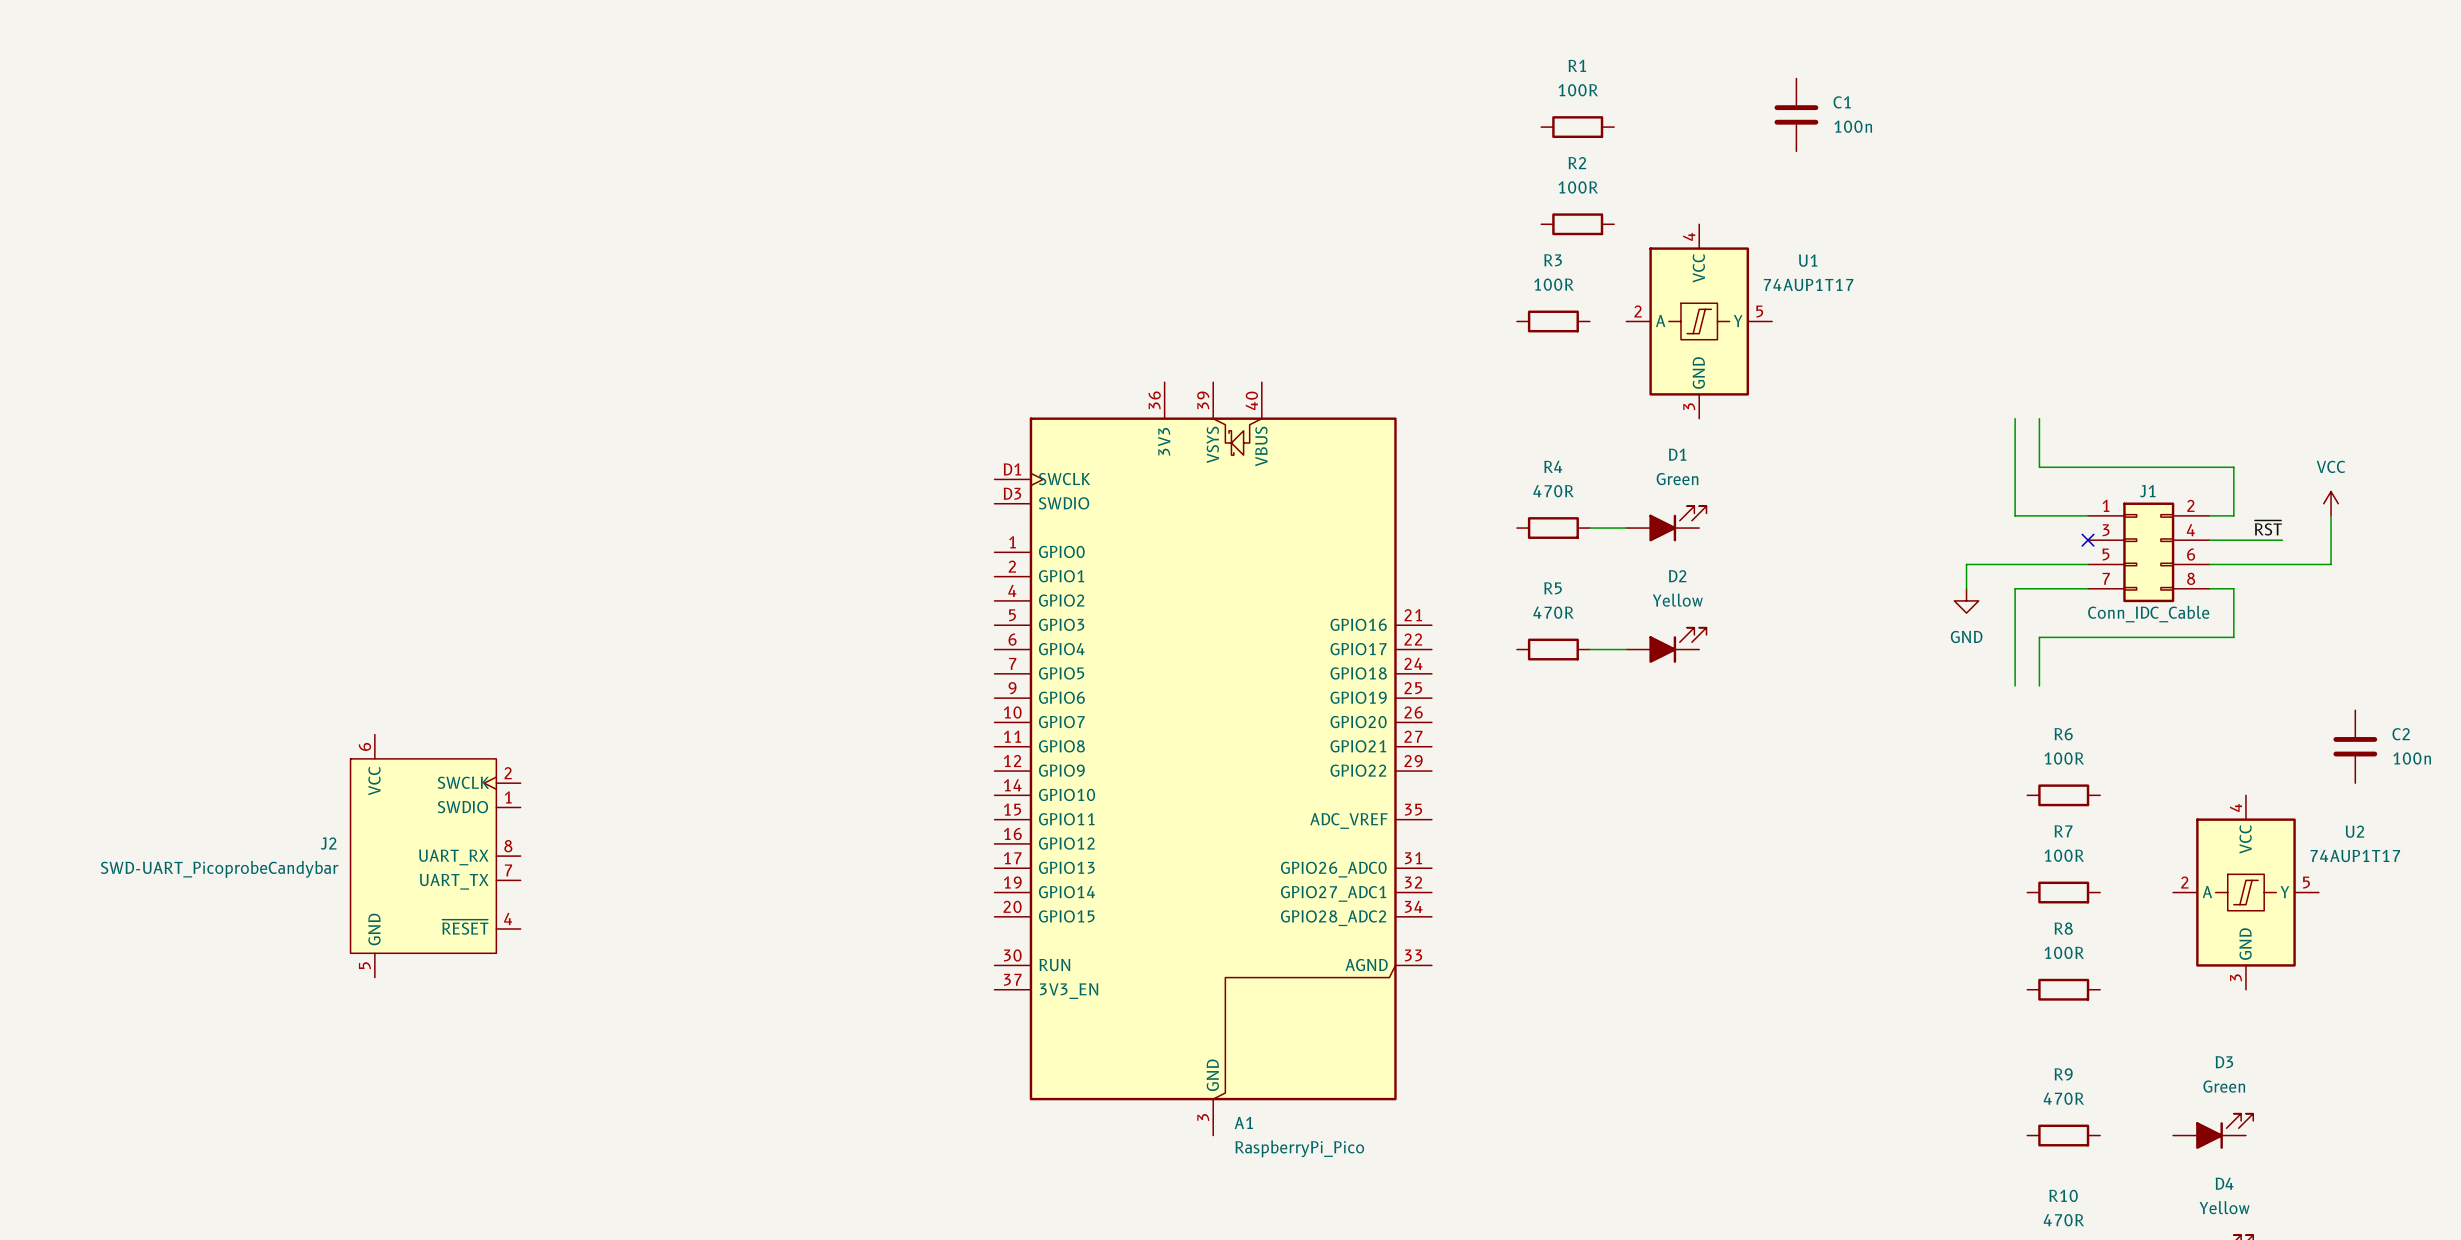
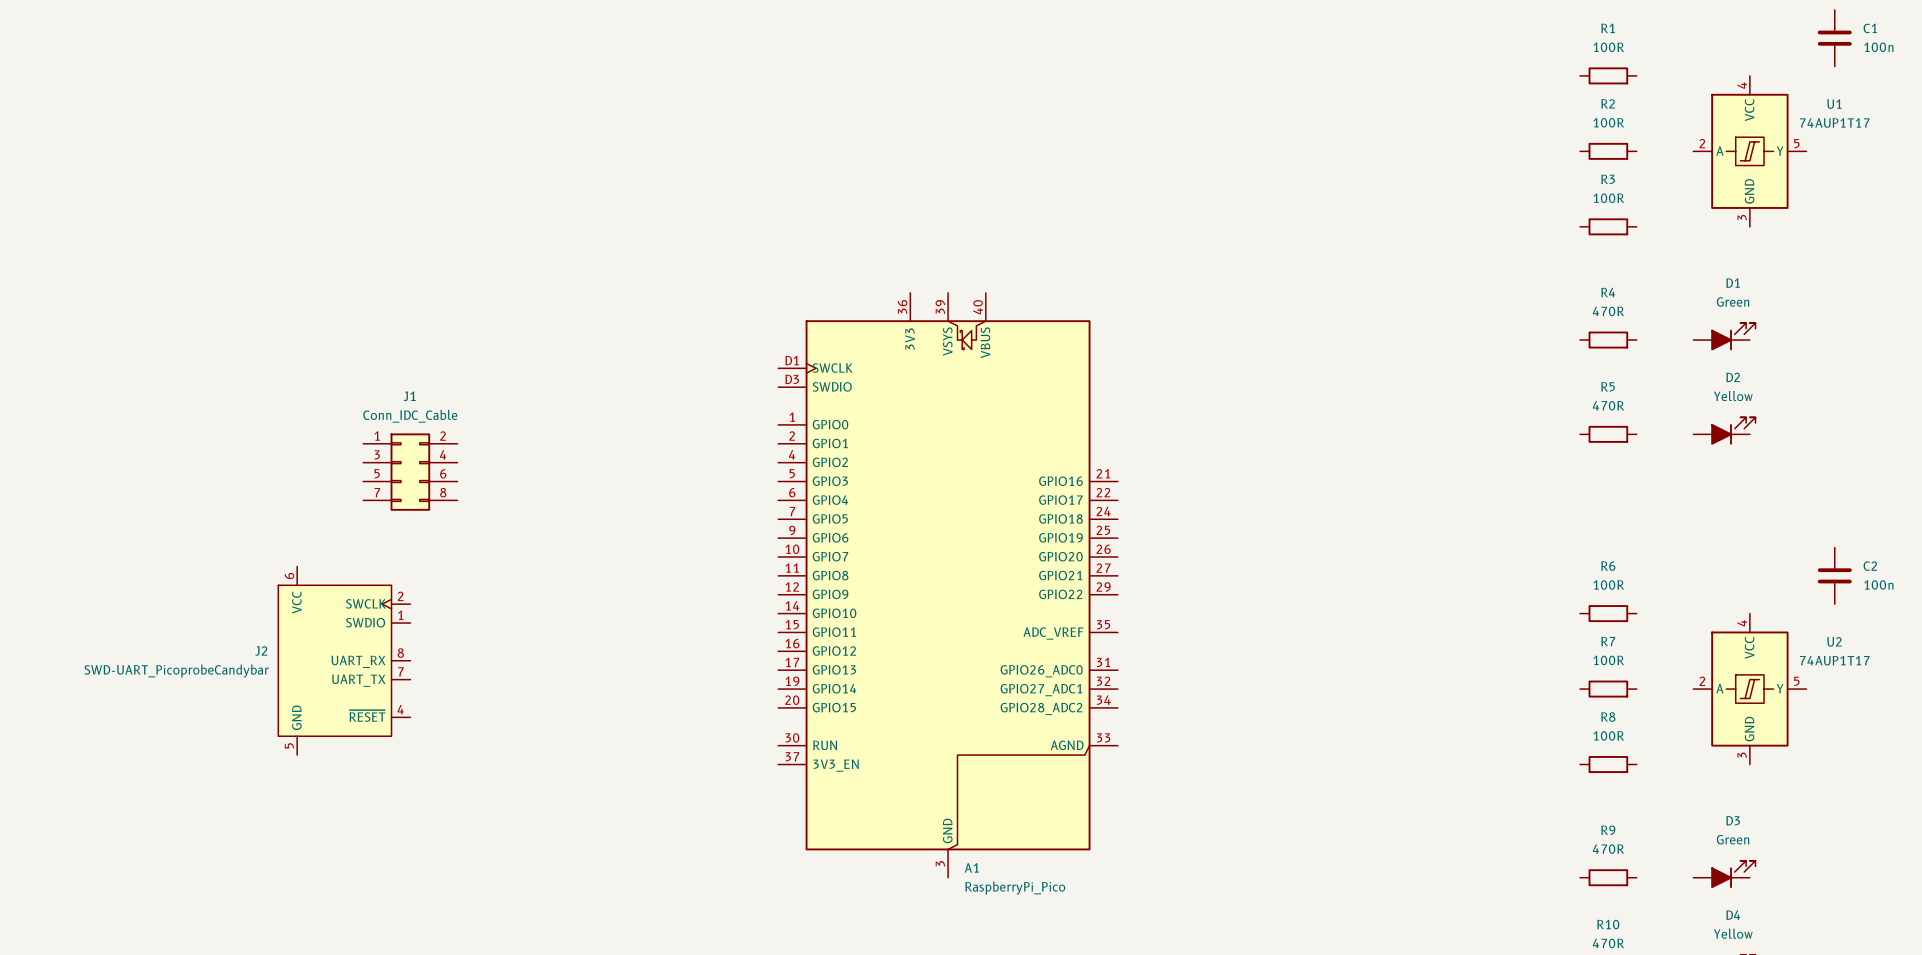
C1 position: (1796, 114) -> (1834, 38)
R1 position: (1577, 127) -> (1608, 75)
R2 position: (1577, 224) -> (1608, 151)
R3 position: (1553, 321) -> (1608, 226)
U1 position: (1699, 321) -> (1749, 151)
wire: (2015, 418) (2015, 515) (2088, 515) -> none
wire: (2039, 418) (2039, 467) (2233, 467) (2233, 515) (2209, 515) -> none
J1 name position: J1 (2147, 491) -> J1 (409, 396)
power symbol: VCC (2331, 503) -> none
wire: (2331, 515) (2331, 564) (2209, 564) -> none
D1 position: (1666, 523) -> (1724, 336)
R4 position: (1553, 528) -> (1608, 340)
wire: (1589, 528) (1626, 528) -> none
label: ~{RST} (2268, 528) -> none
no-connect mark: (2088, 540) -> none
wire: (2209, 540) (2282, 540) -> none
J1 position: (2148, 552) -> (410, 472)
wire: (2088, 564) (1966, 564) (1966, 588) -> none
wire: (2088, 588) (2015, 588) (2015, 685) -> none
wire: (2209, 588) (2233, 588) (2233, 637) (2039, 637) (2039, 685) -> none
power symbol: GND (1966, 600) -> none
J1 value position: Conn_IDC_Cable (2148, 614) -> Conn_IDC_Cable (410, 416)
D2 position: (1666, 645) -> (1724, 431)
R5 position: (1553, 649) -> (1608, 434)
wire: (1589, 649) (1626, 649) -> none

